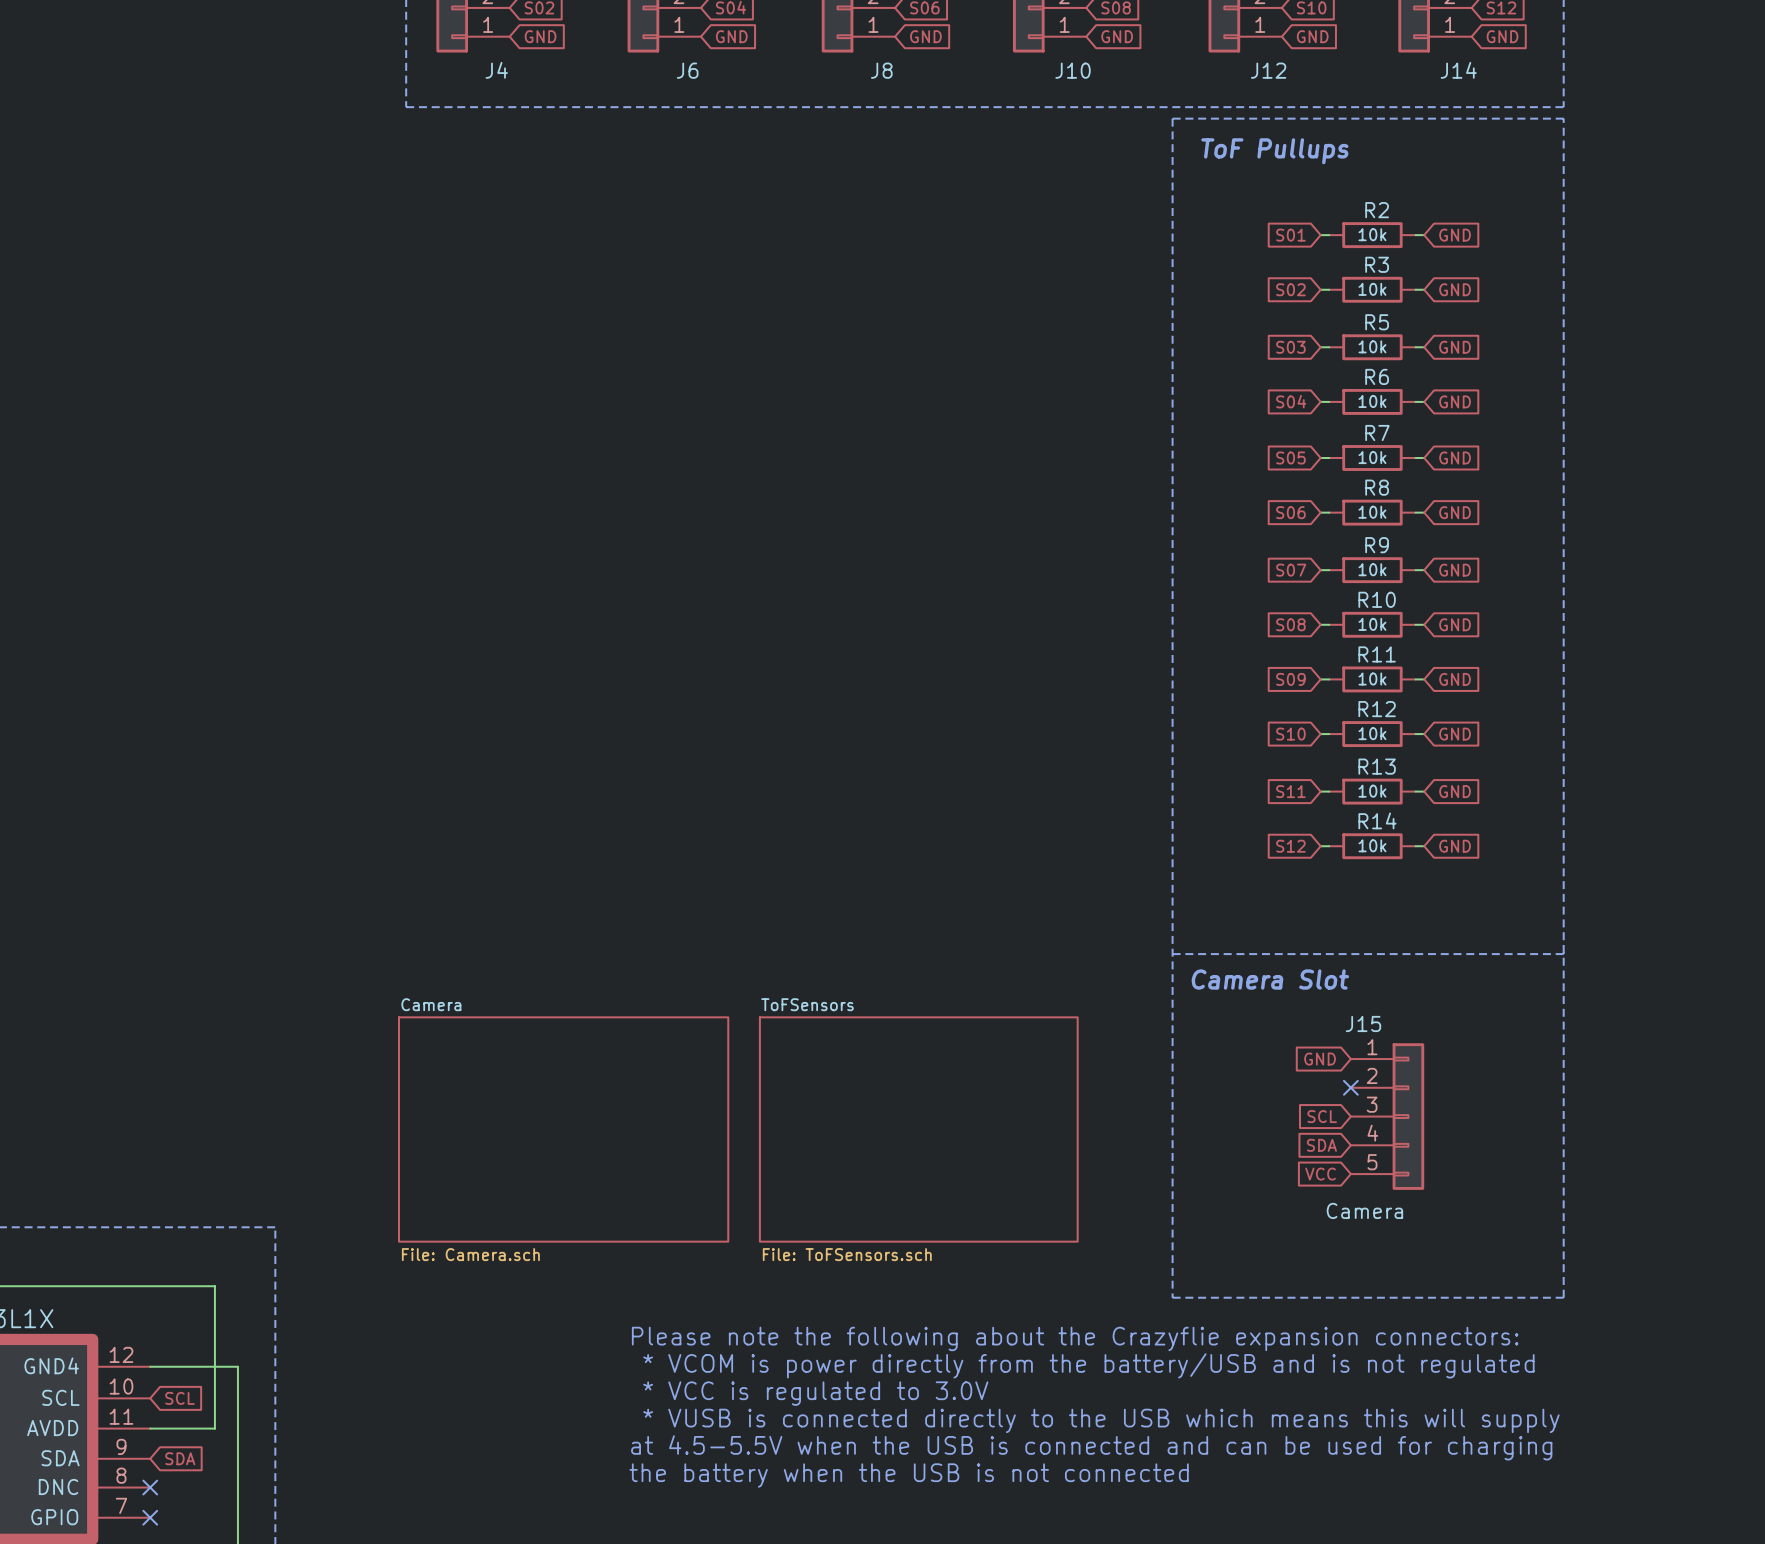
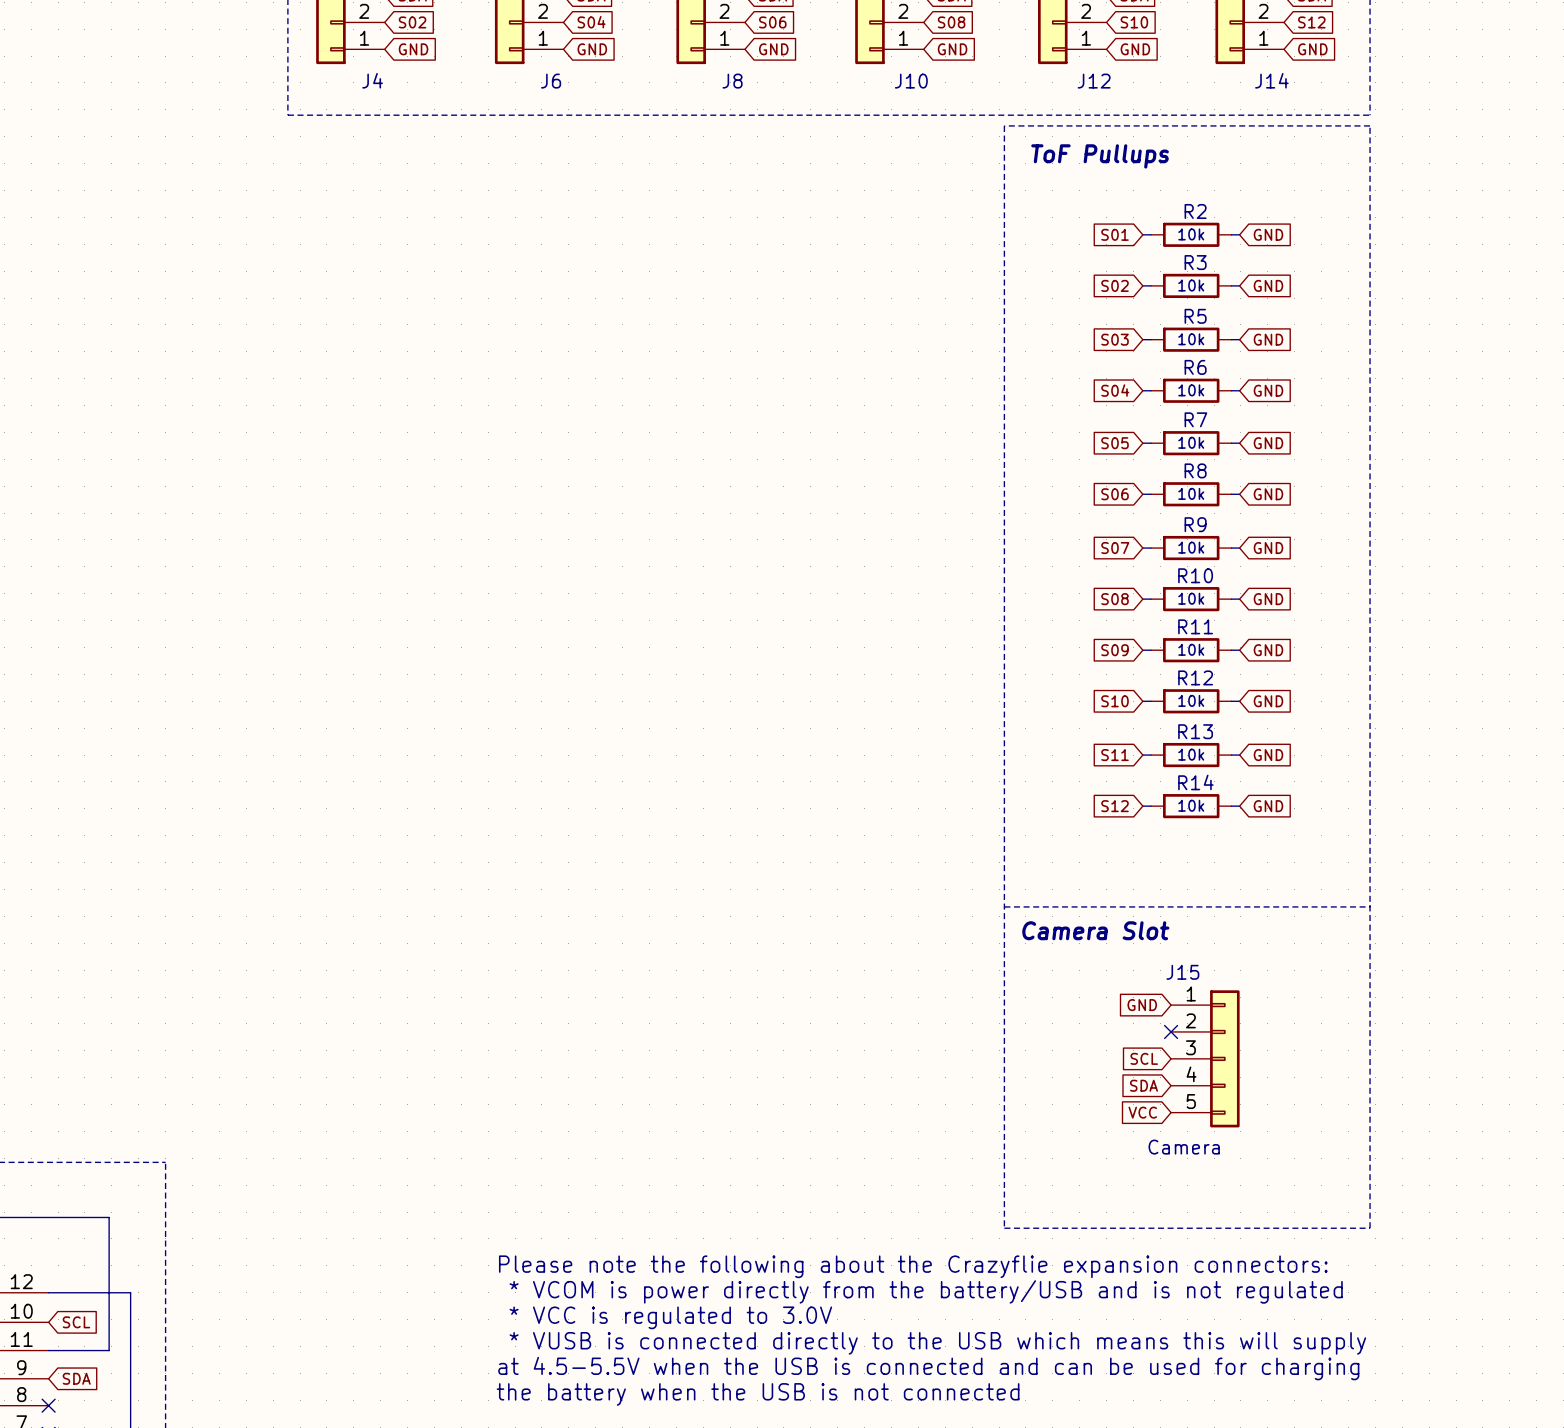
sheet Camera: File: Camera.sch (563, 1129) -> none
sheet ToFSensors: File: ToFSensors.sch (918, 1129) -> none

